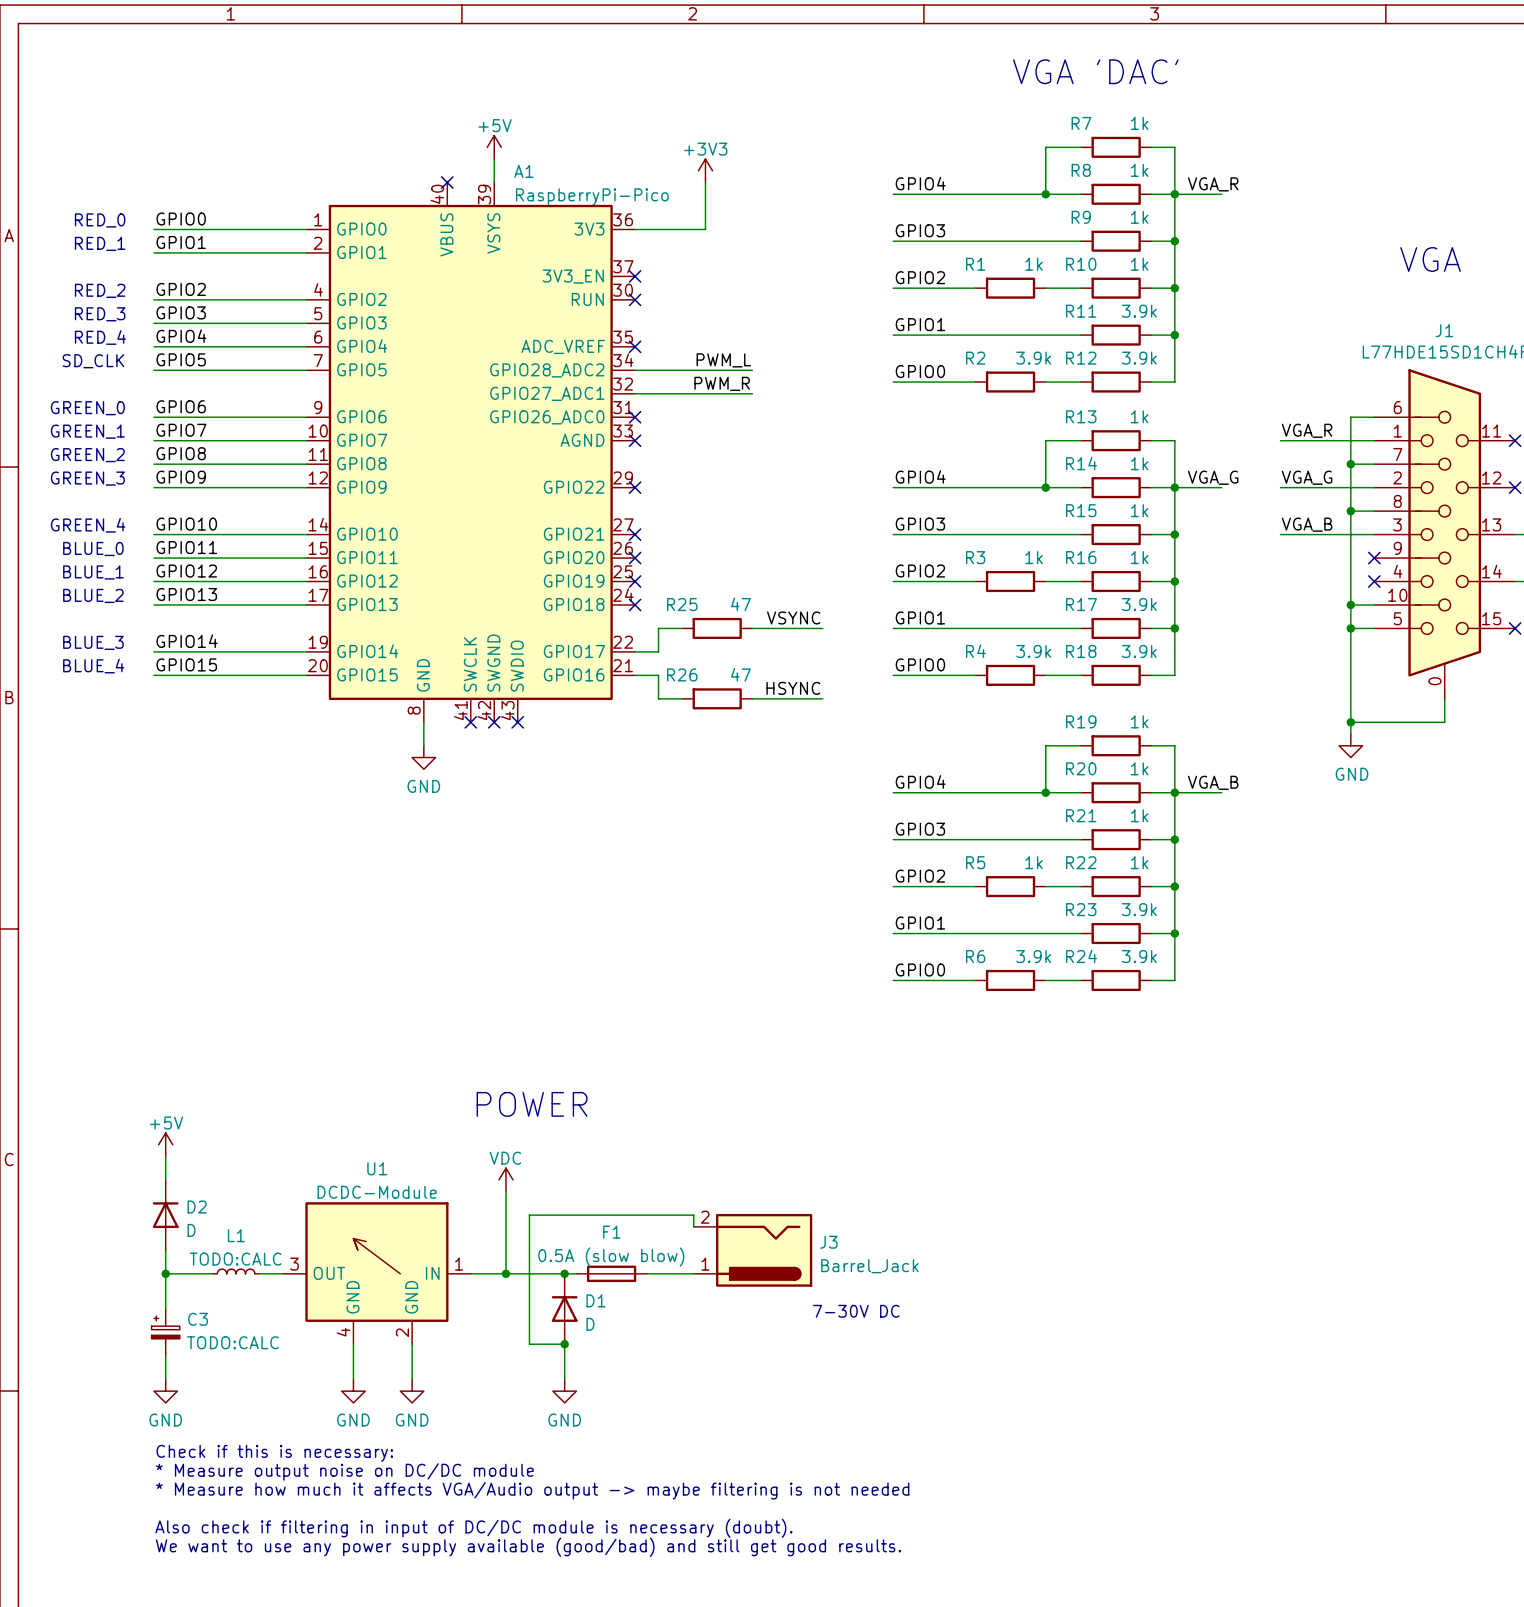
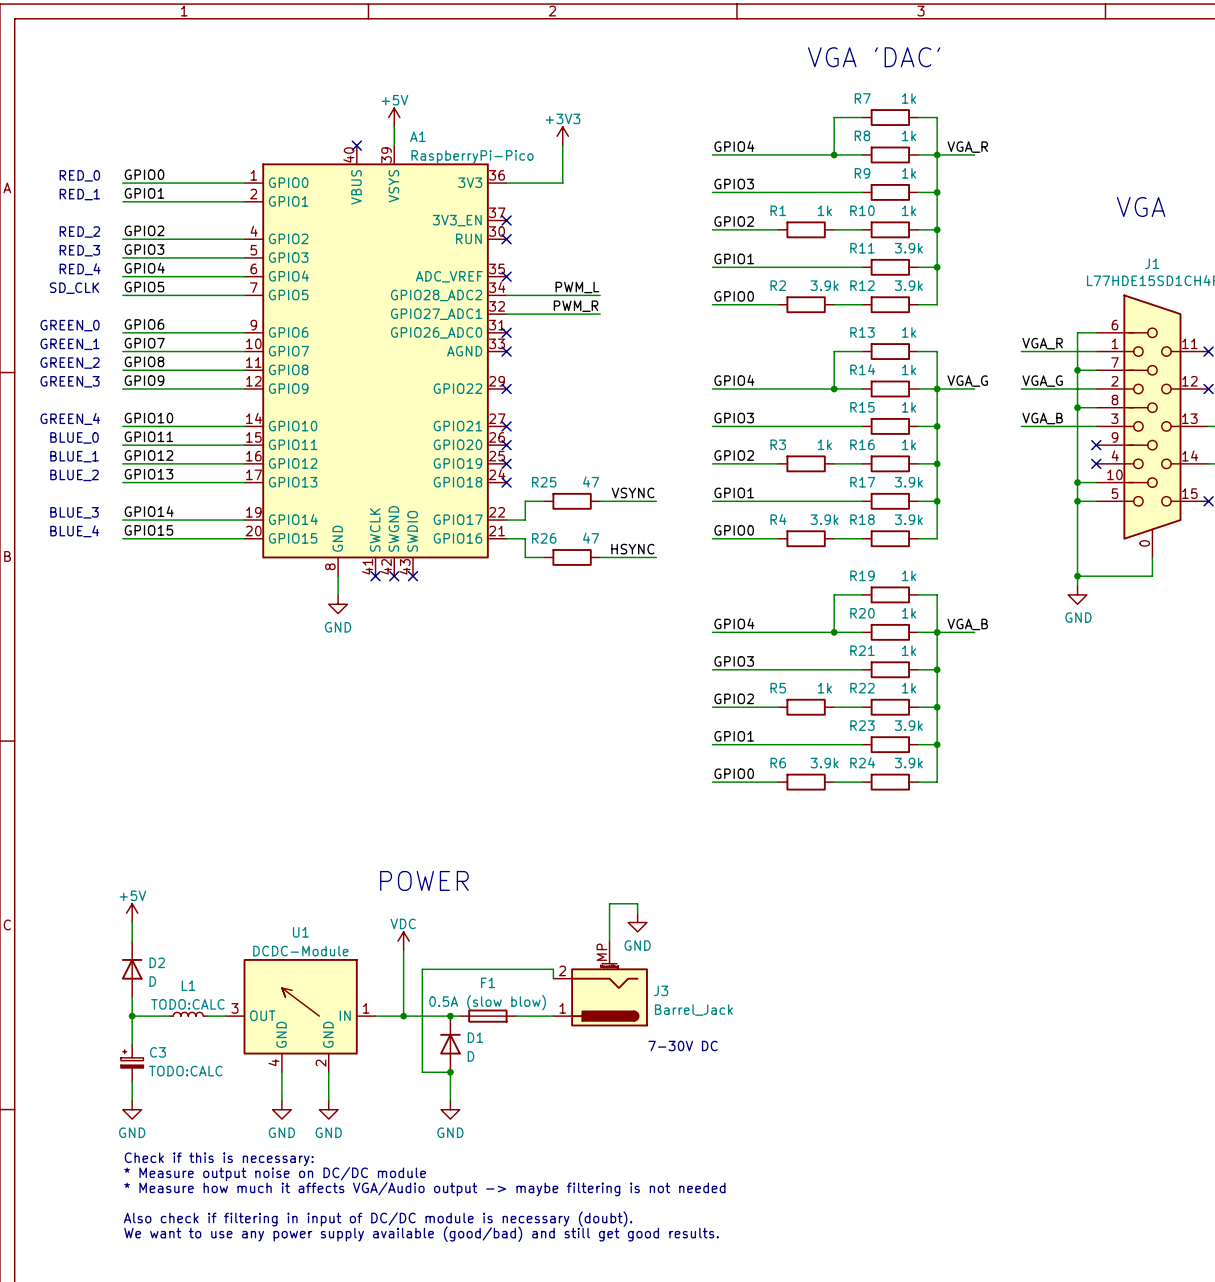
wire: none -> (637, 913) (637, 903) (609, 903) (609, 941)
power symbol: none -> GND (637, 922)
J3 symbol: [693, 1213, 813, 1287] -> [553, 941, 648, 1027]

